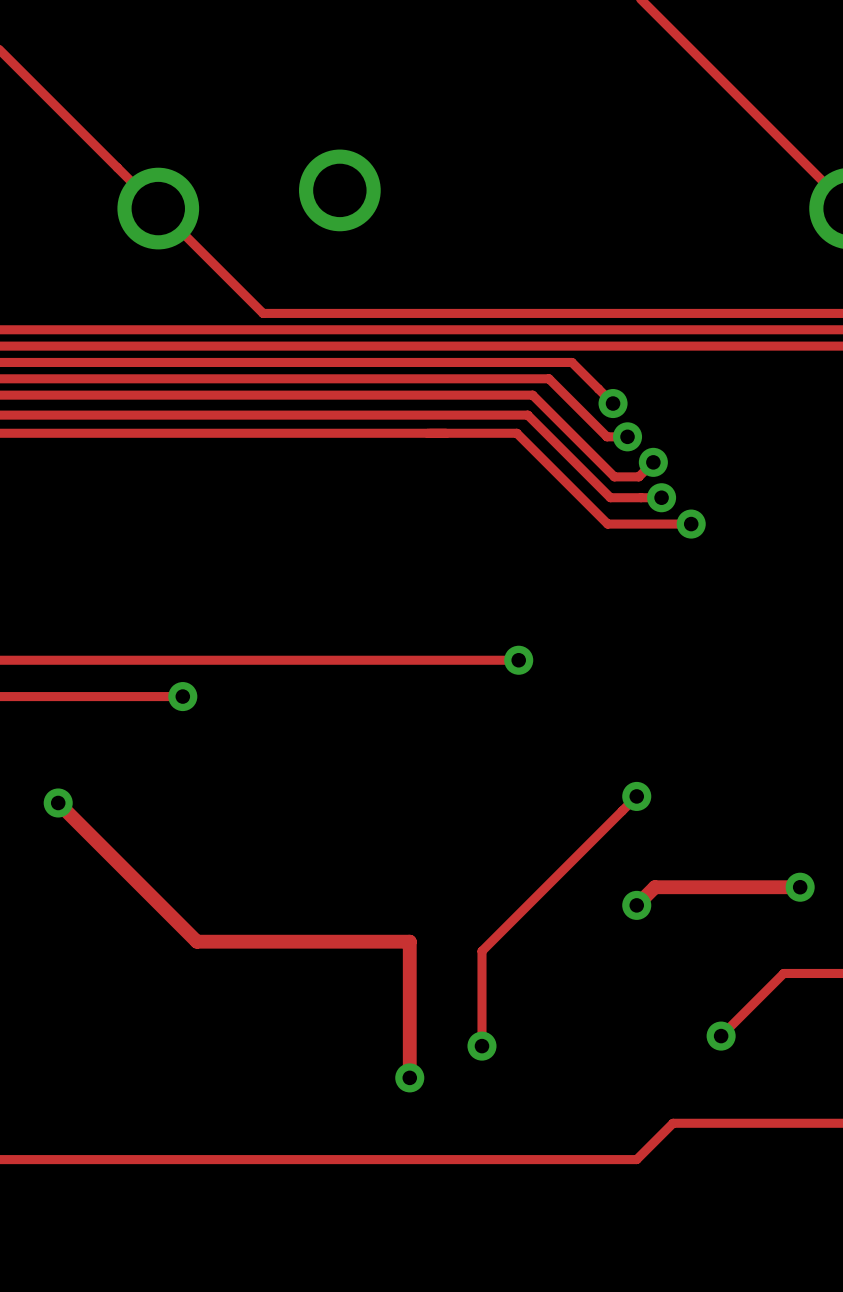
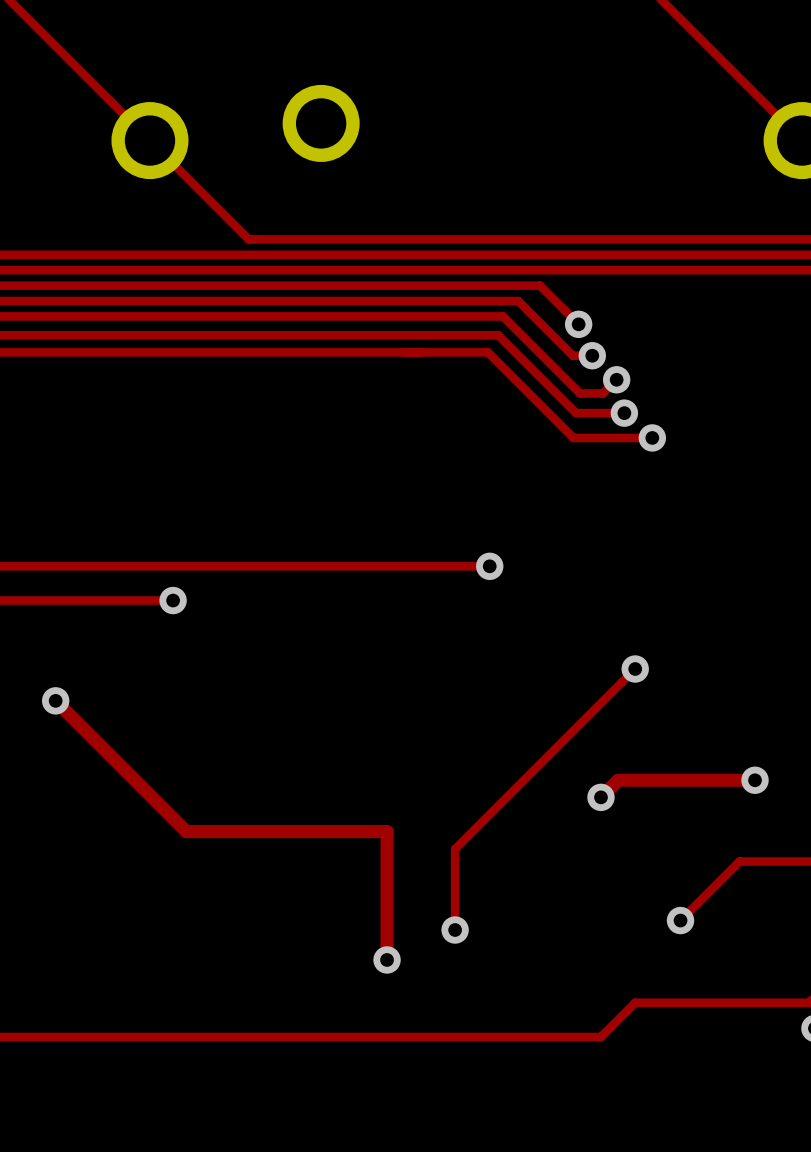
track: (636, 796) (481, 951) (481, 960) -> (635, 669) (455, 849)
via position: (636, 796) -> (635, 669)

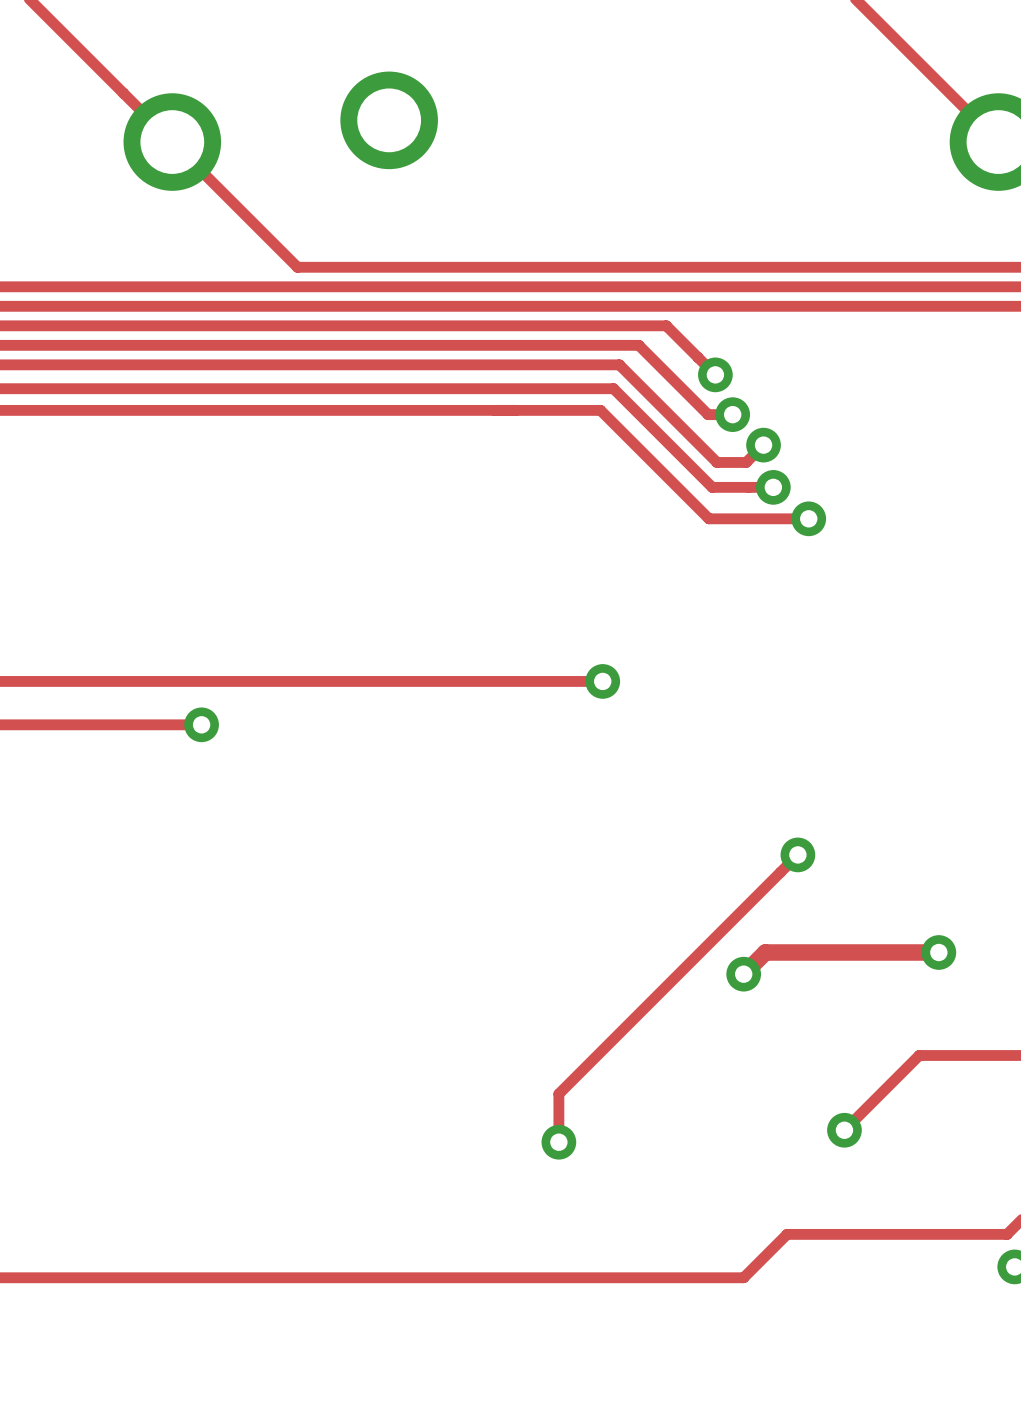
track: (635, 669) (455, 849) (455, 891) -> (797, 854) (558, 1093)
via position: (635, 669) -> (797, 854)
track: (55, 700) (186, 831) (387, 831) (387, 959) -> none
via: (55, 700) -> none
via: (387, 959) -> none

